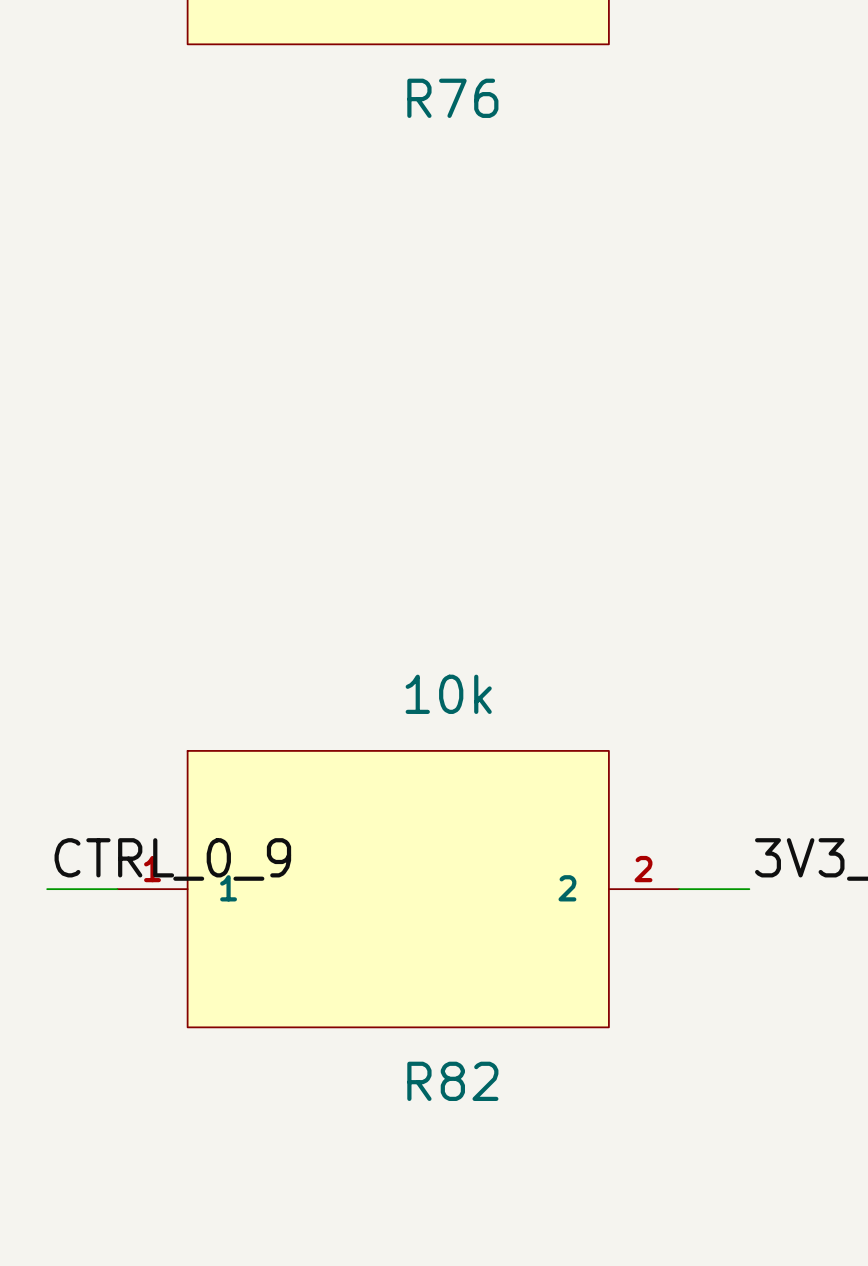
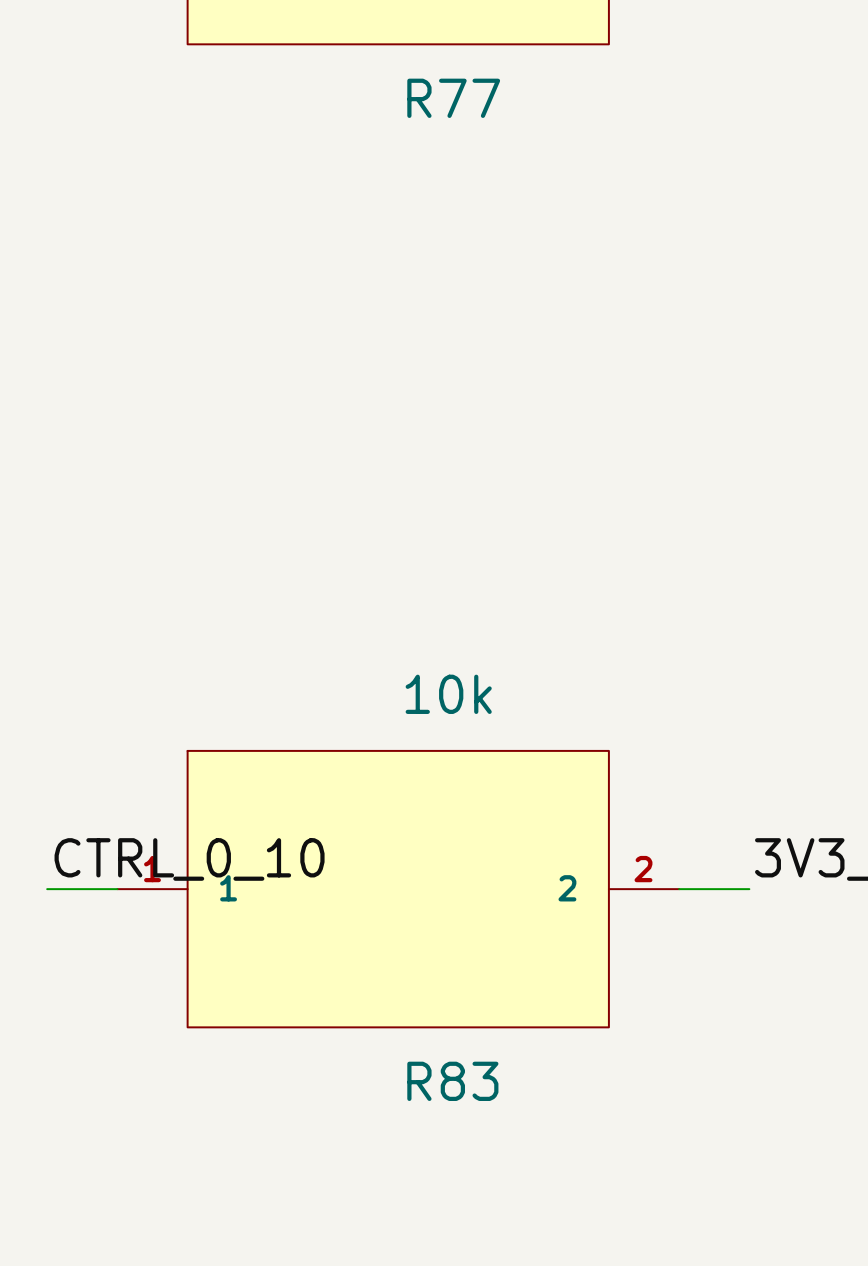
R76 name: R76 (452, 98) -> R77 (453, 98)
label: CTRL_0_9 (172, 859) -> CTRL_0_10 (189, 859)
R82 name: R82 (452, 1081) -> R83 (452, 1081)

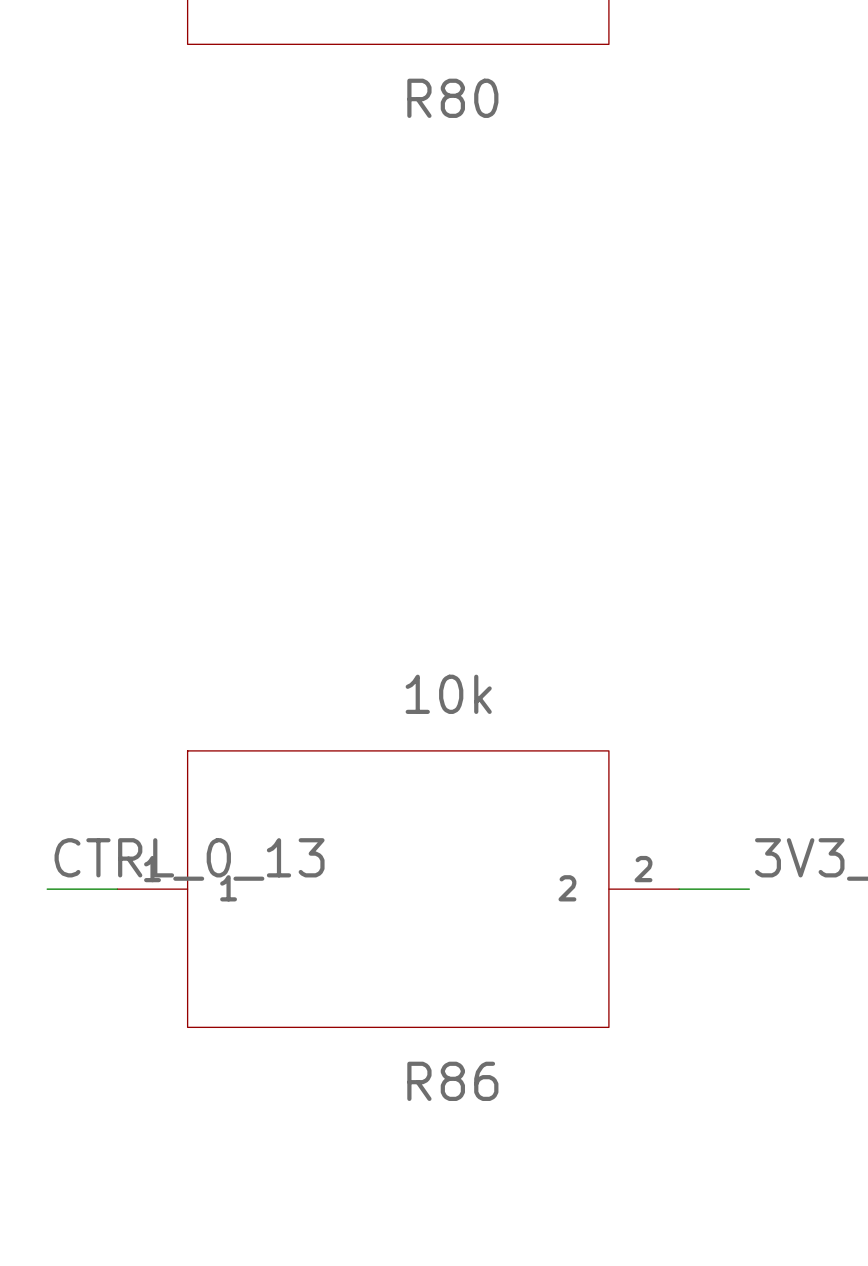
R77 name: R77 (453, 98) -> R80 (452, 98)
label: CTRL_0_10 (189, 859) -> CTRL_0_13 (189, 859)
R83 name: R83 (452, 1081) -> R86 (452, 1081)

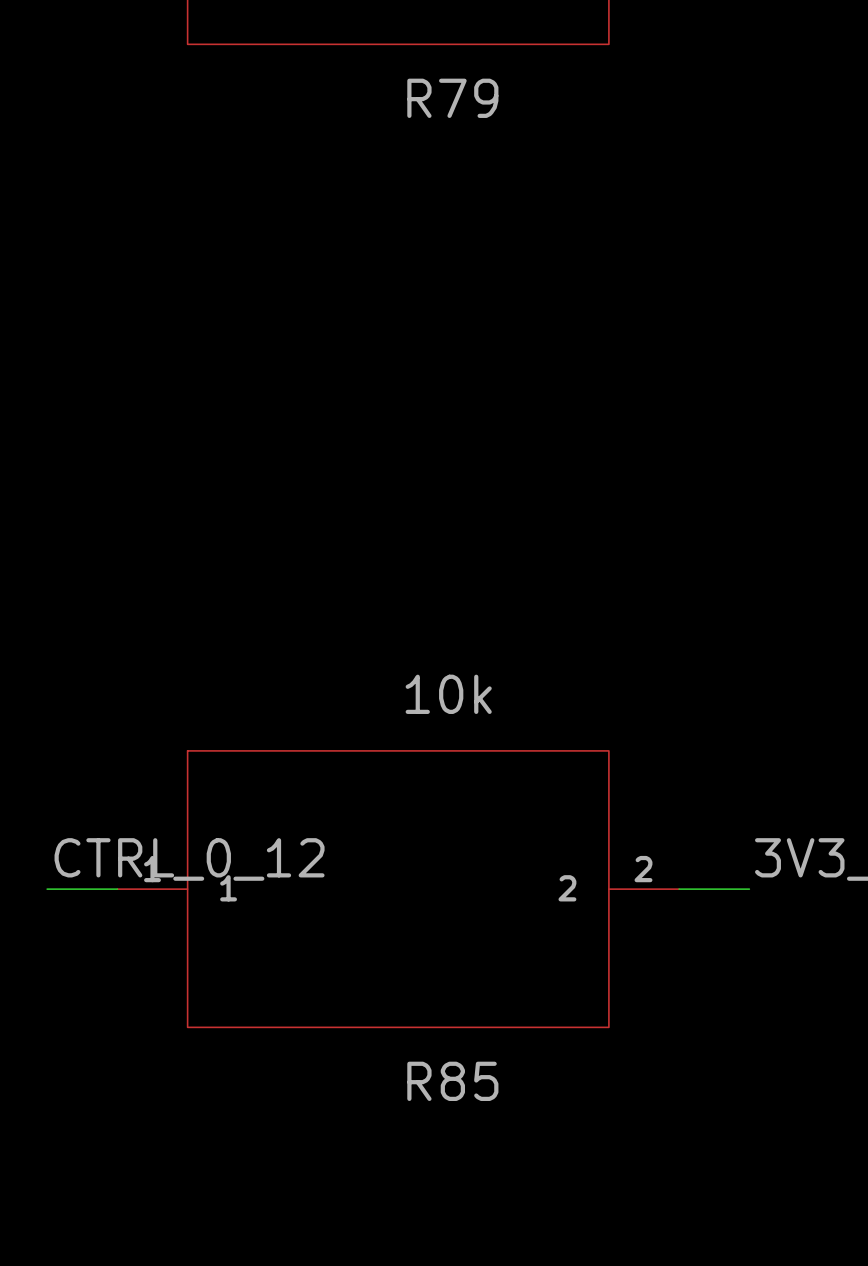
R80 name: R80 (452, 98) -> R79 (452, 98)
label: CTRL_0_13 (189, 859) -> CTRL_0_12 (189, 859)
R86 name: R86 (452, 1081) -> R85 (452, 1081)

